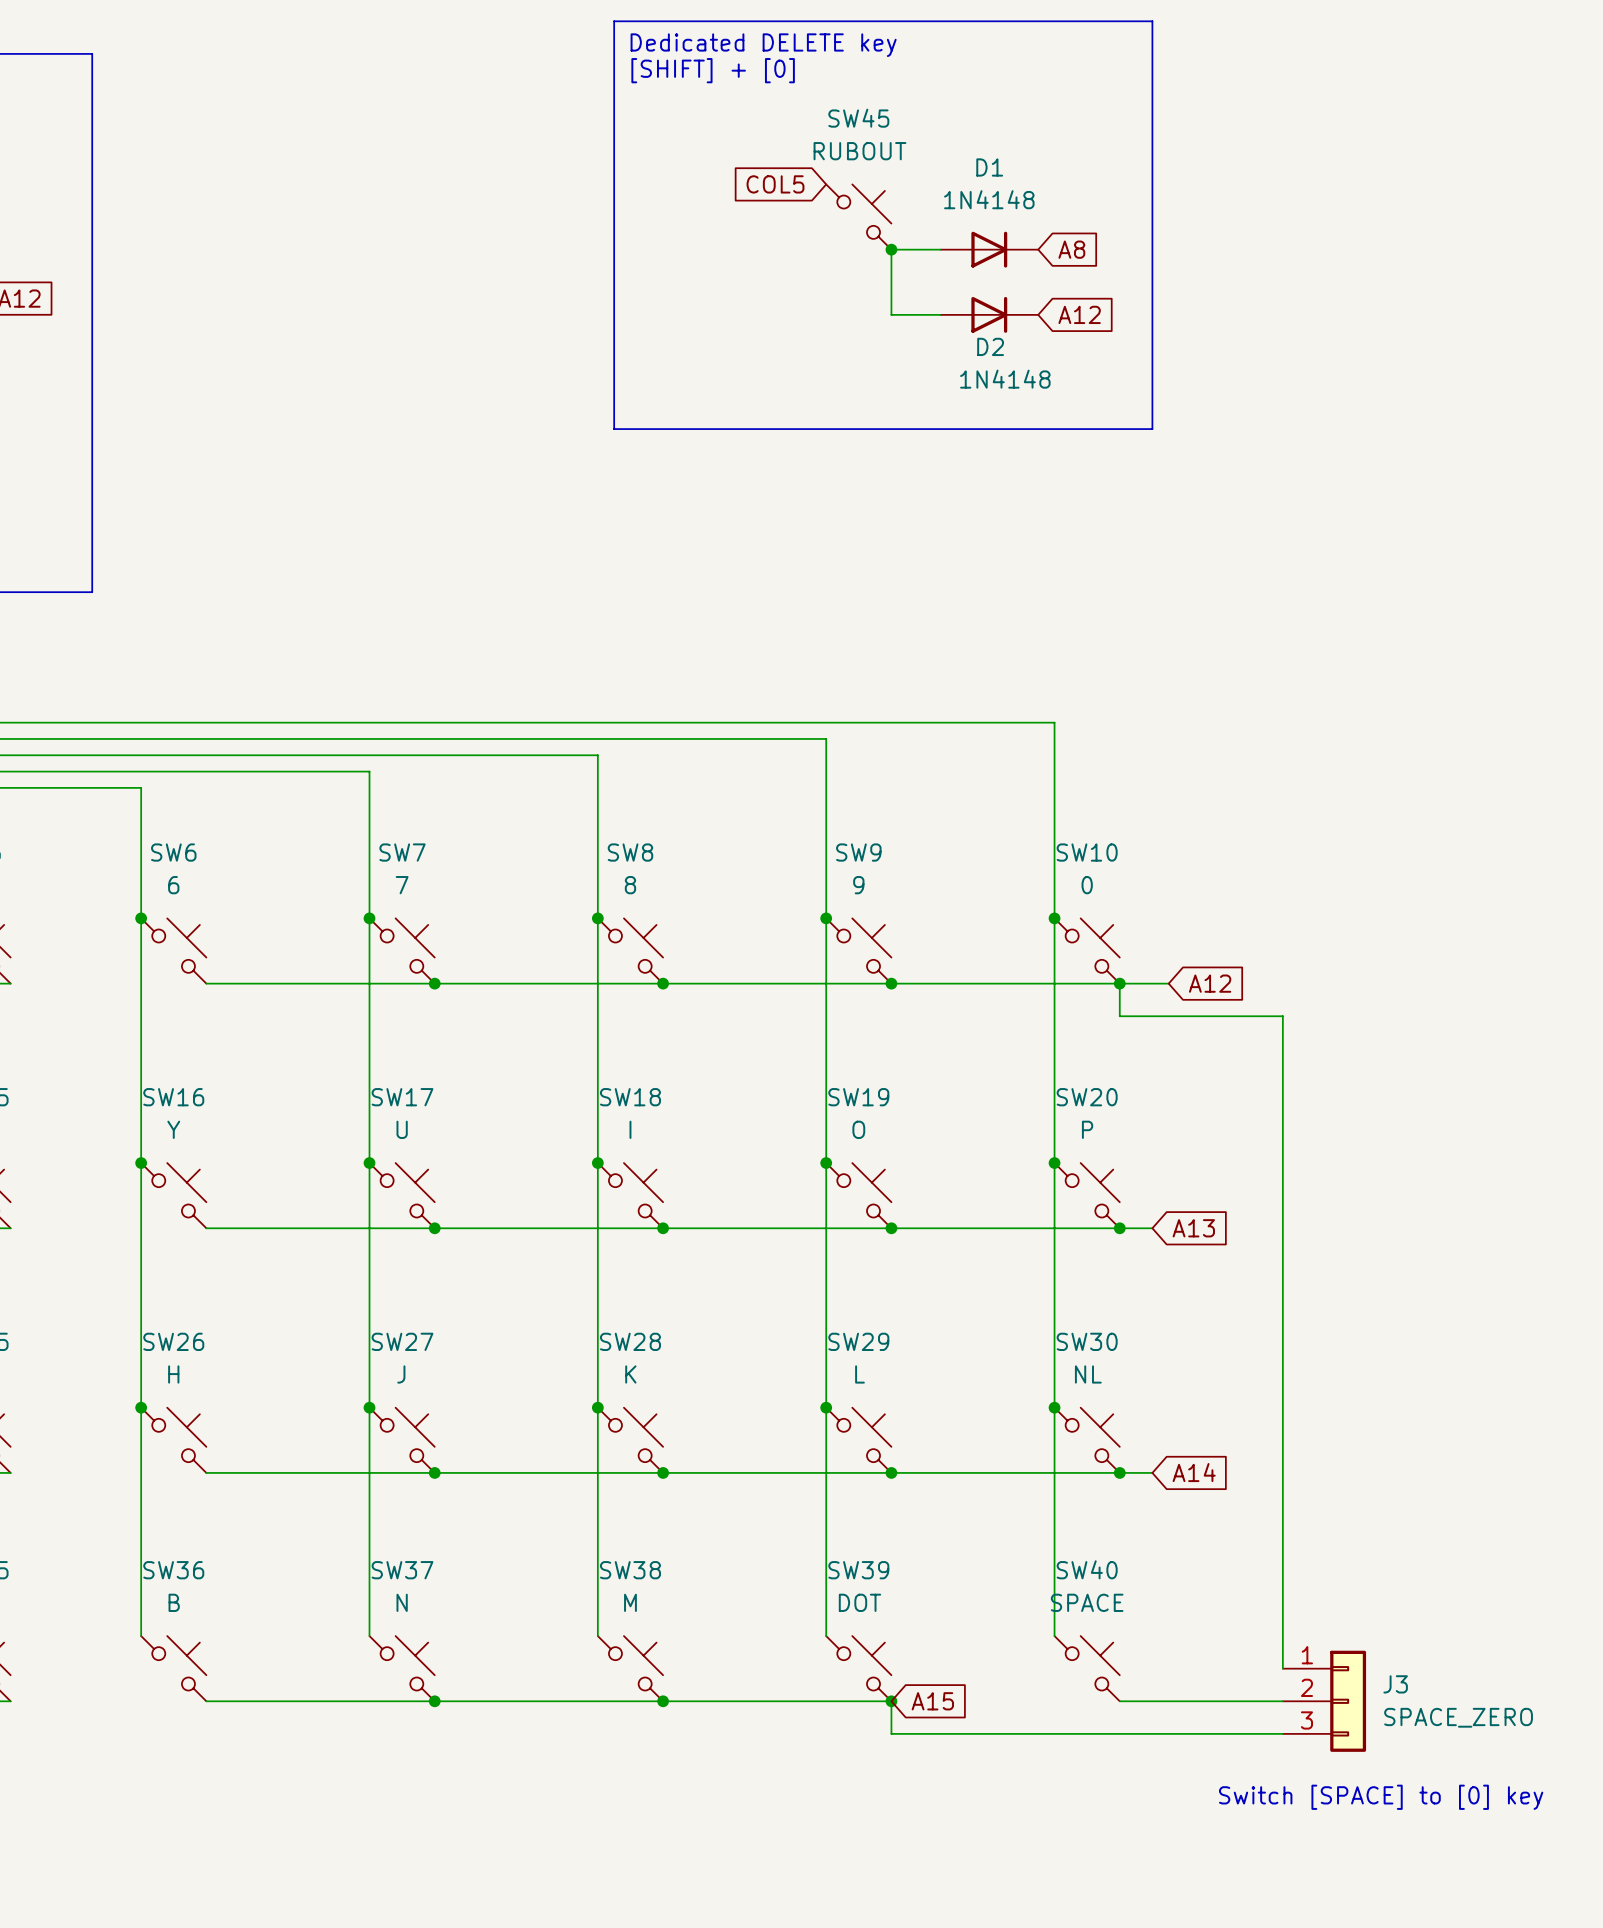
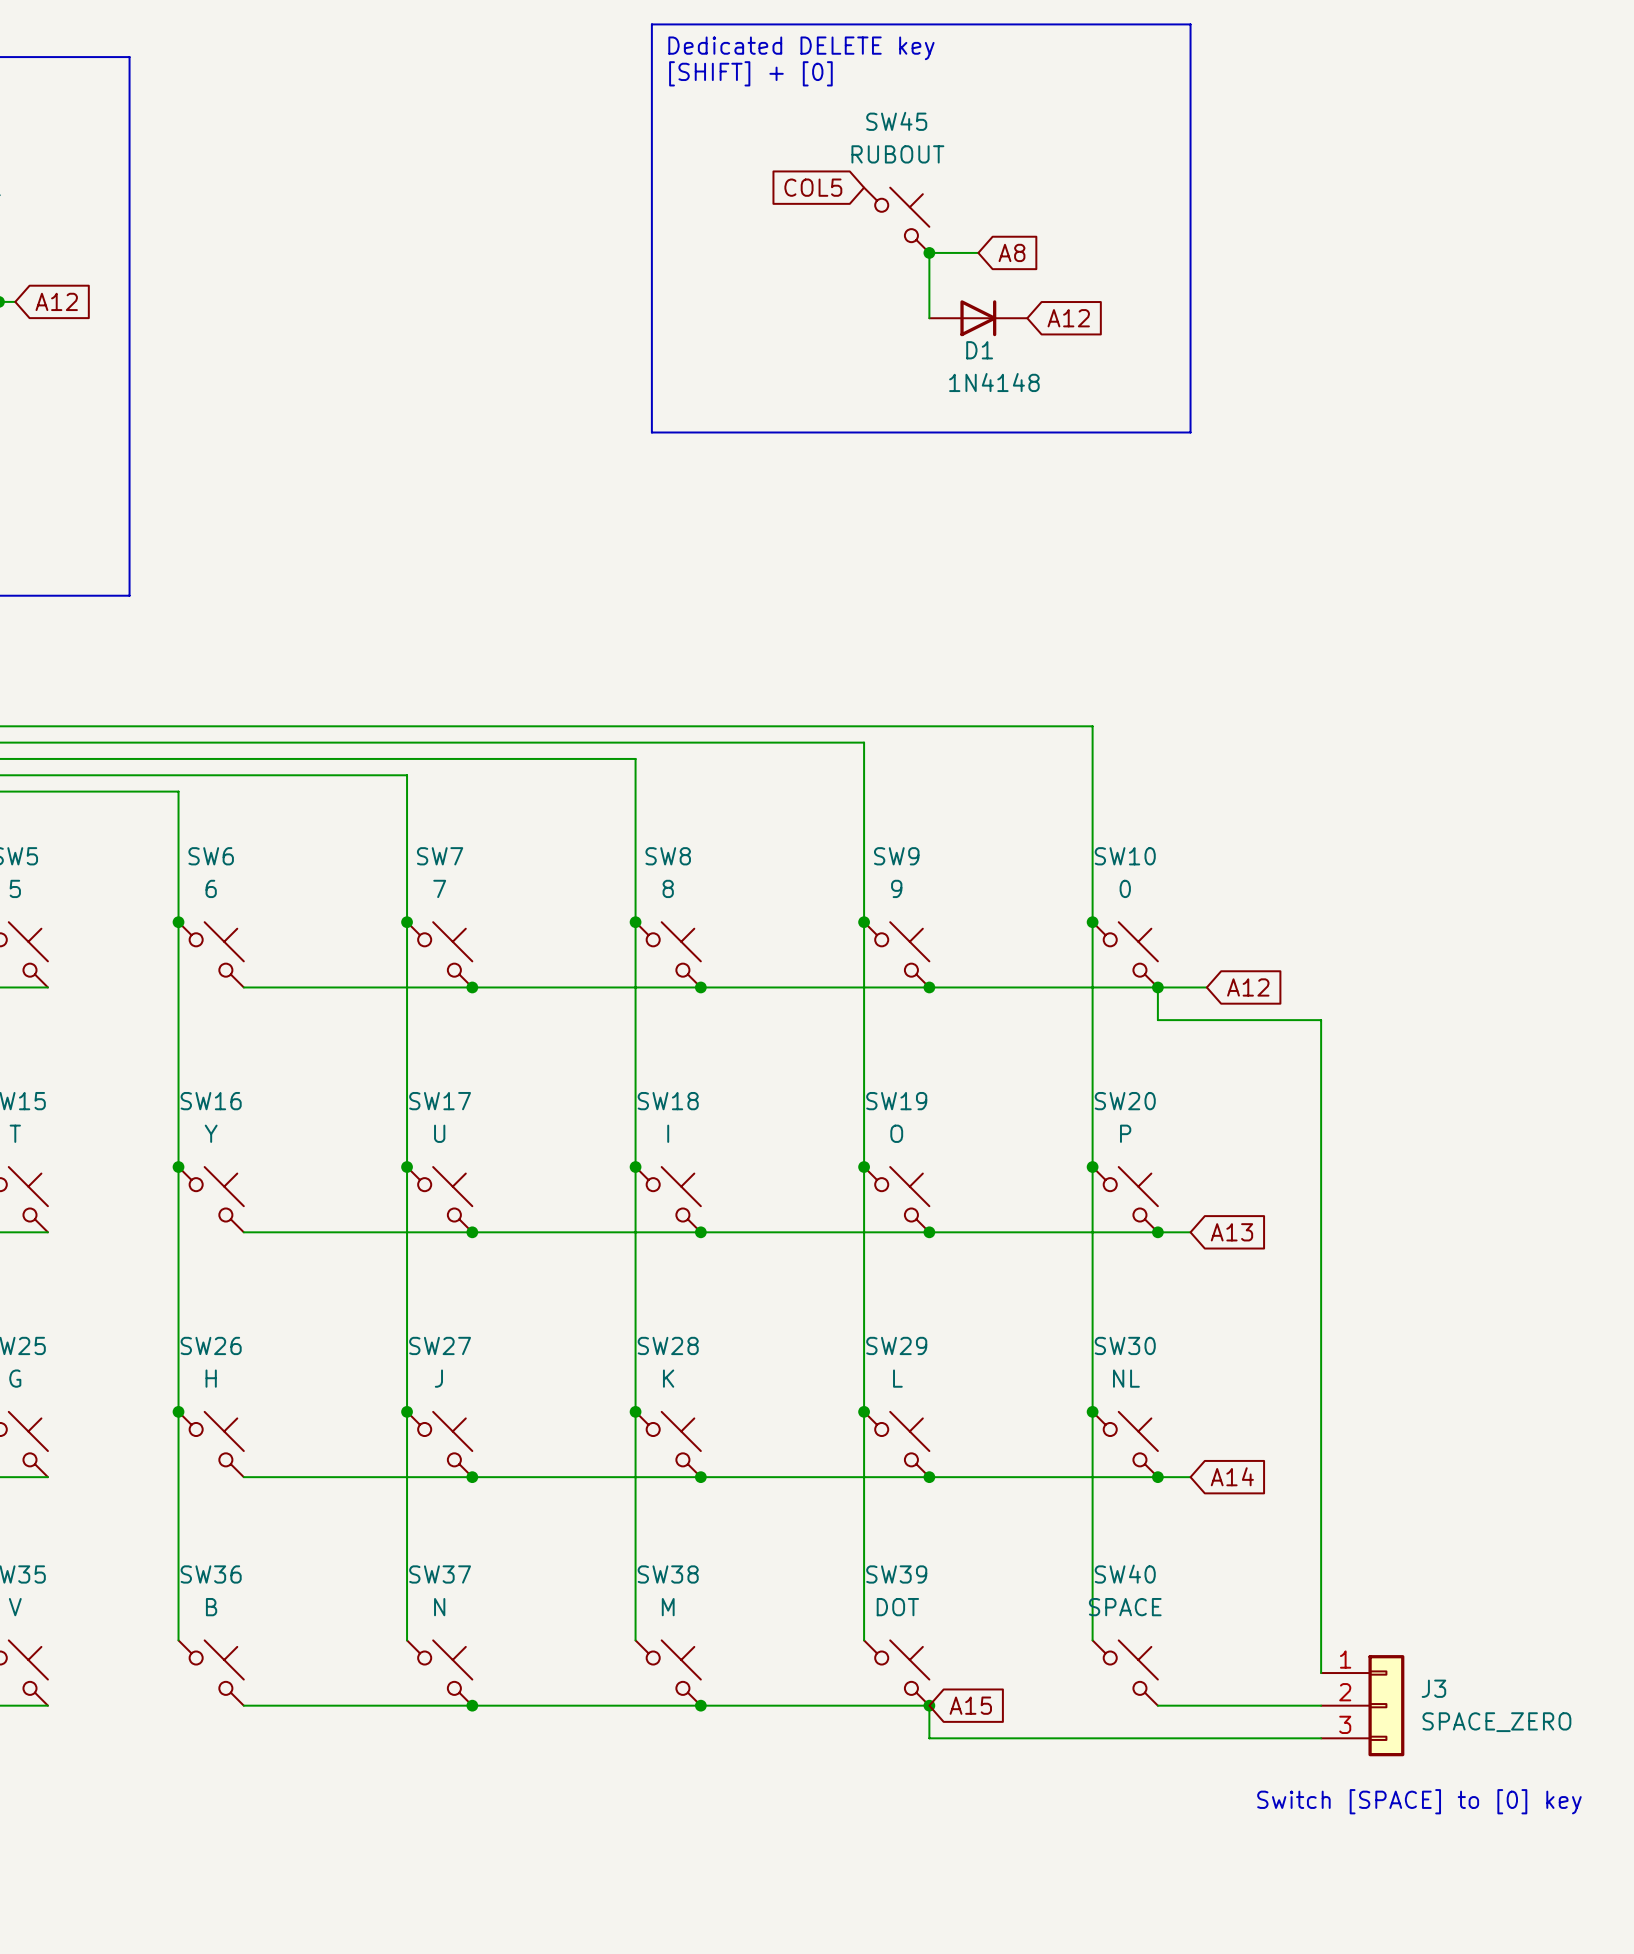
D1 name position: D1 (989, 167) -> D1 (979, 350)
D1 value position: 1N4148 (989, 199) -> 1N4148 (994, 382)
D1 position: (989, 249) -> (978, 318)
global label position: A8 (1071, 249) -> A8 (1011, 252)
D2: 1N4148 (989, 314) -> none
global label position: A12 (1079, 314) -> A12 (1068, 318)

